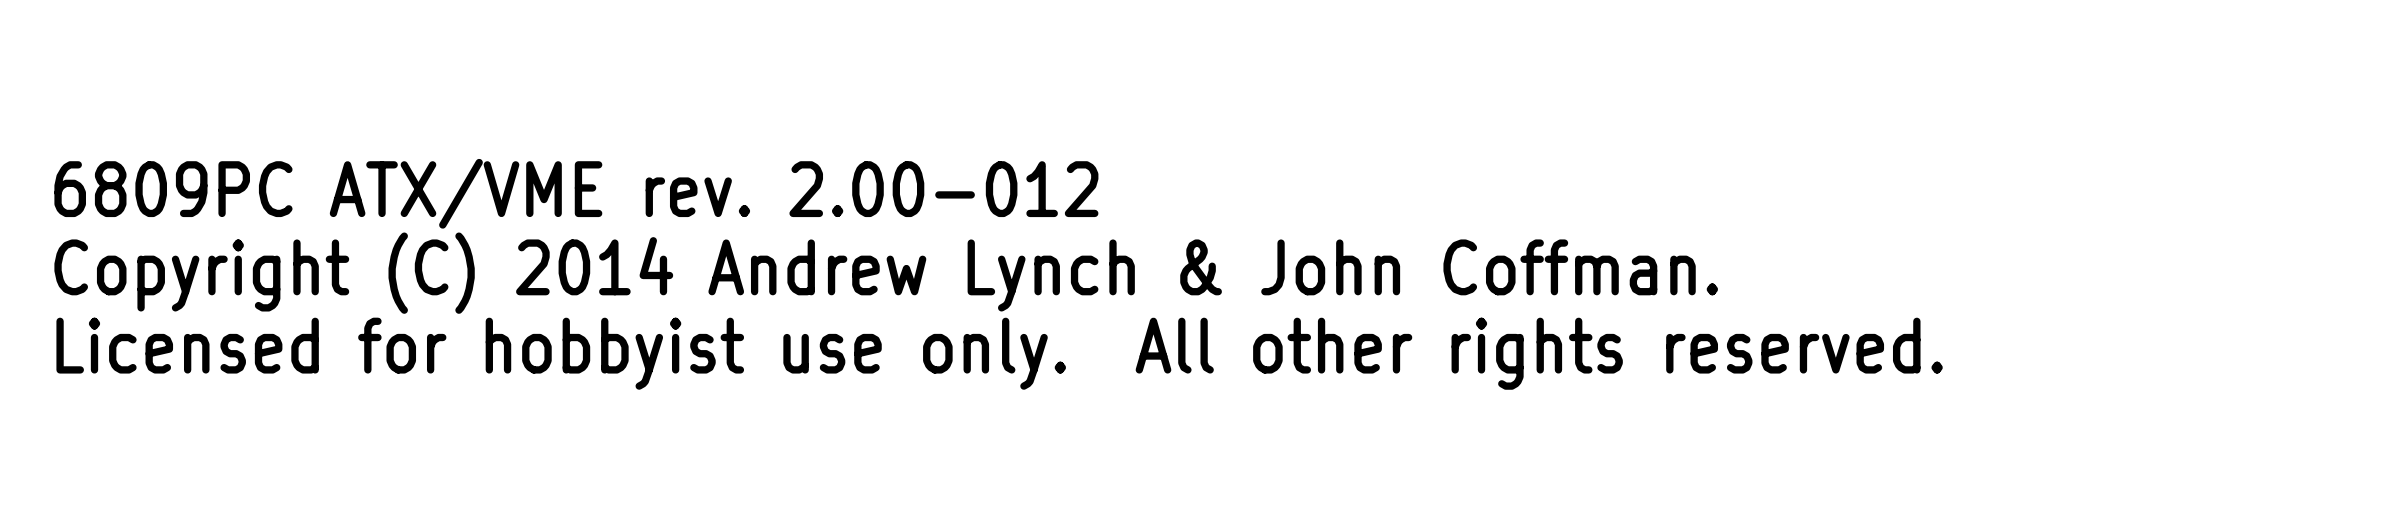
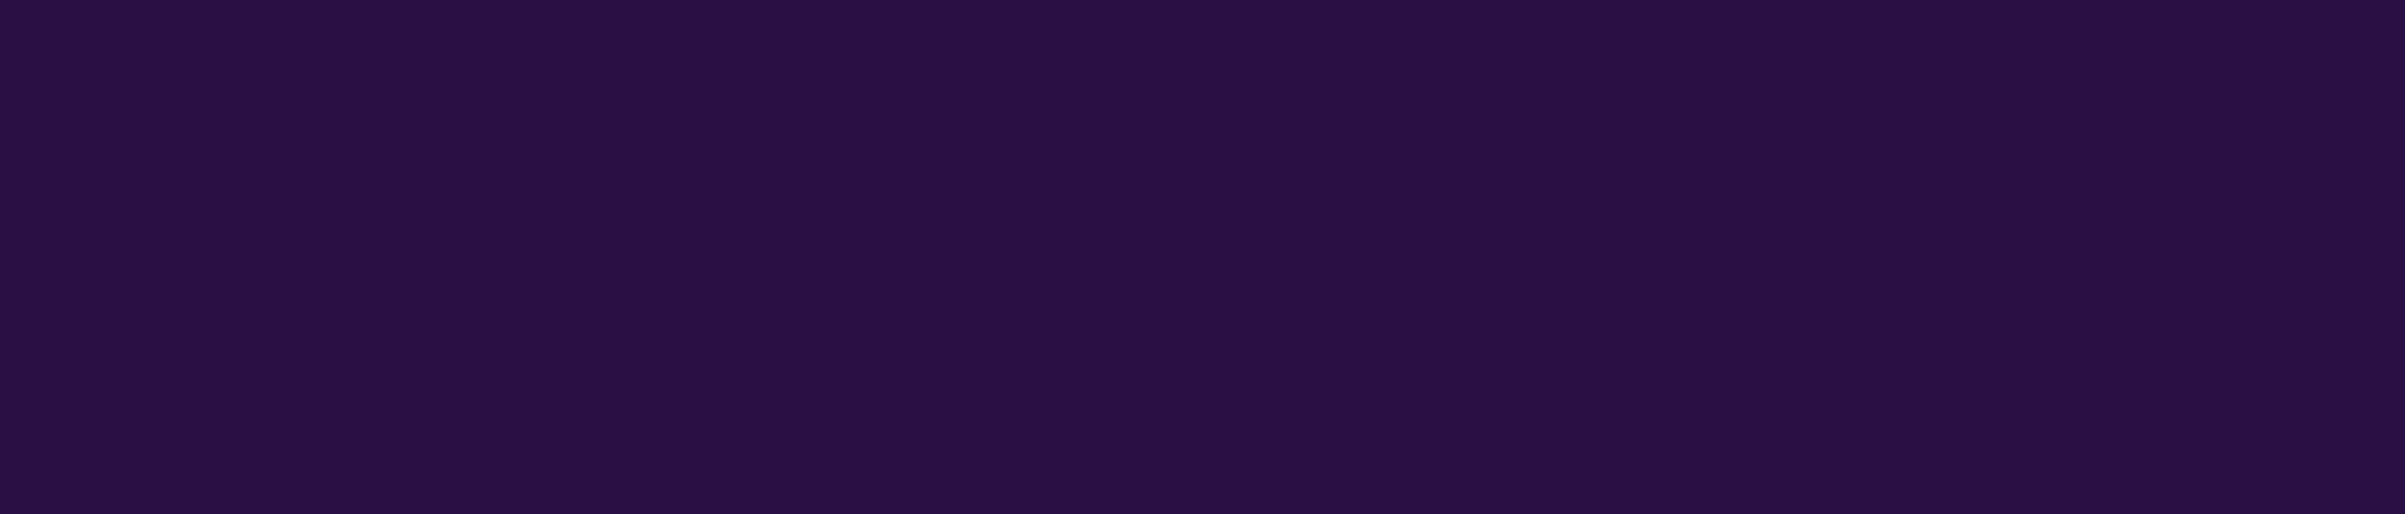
text: 6809PC ATX/VME rev. 2.00-012 (576, 193) -> none
text: Copyright (C) 2014 Andrew Lynch & John Coffman. (886, 273) -> none
text: Licensed for hobbyist use only. All other rights reserved. (999, 353) -> none

